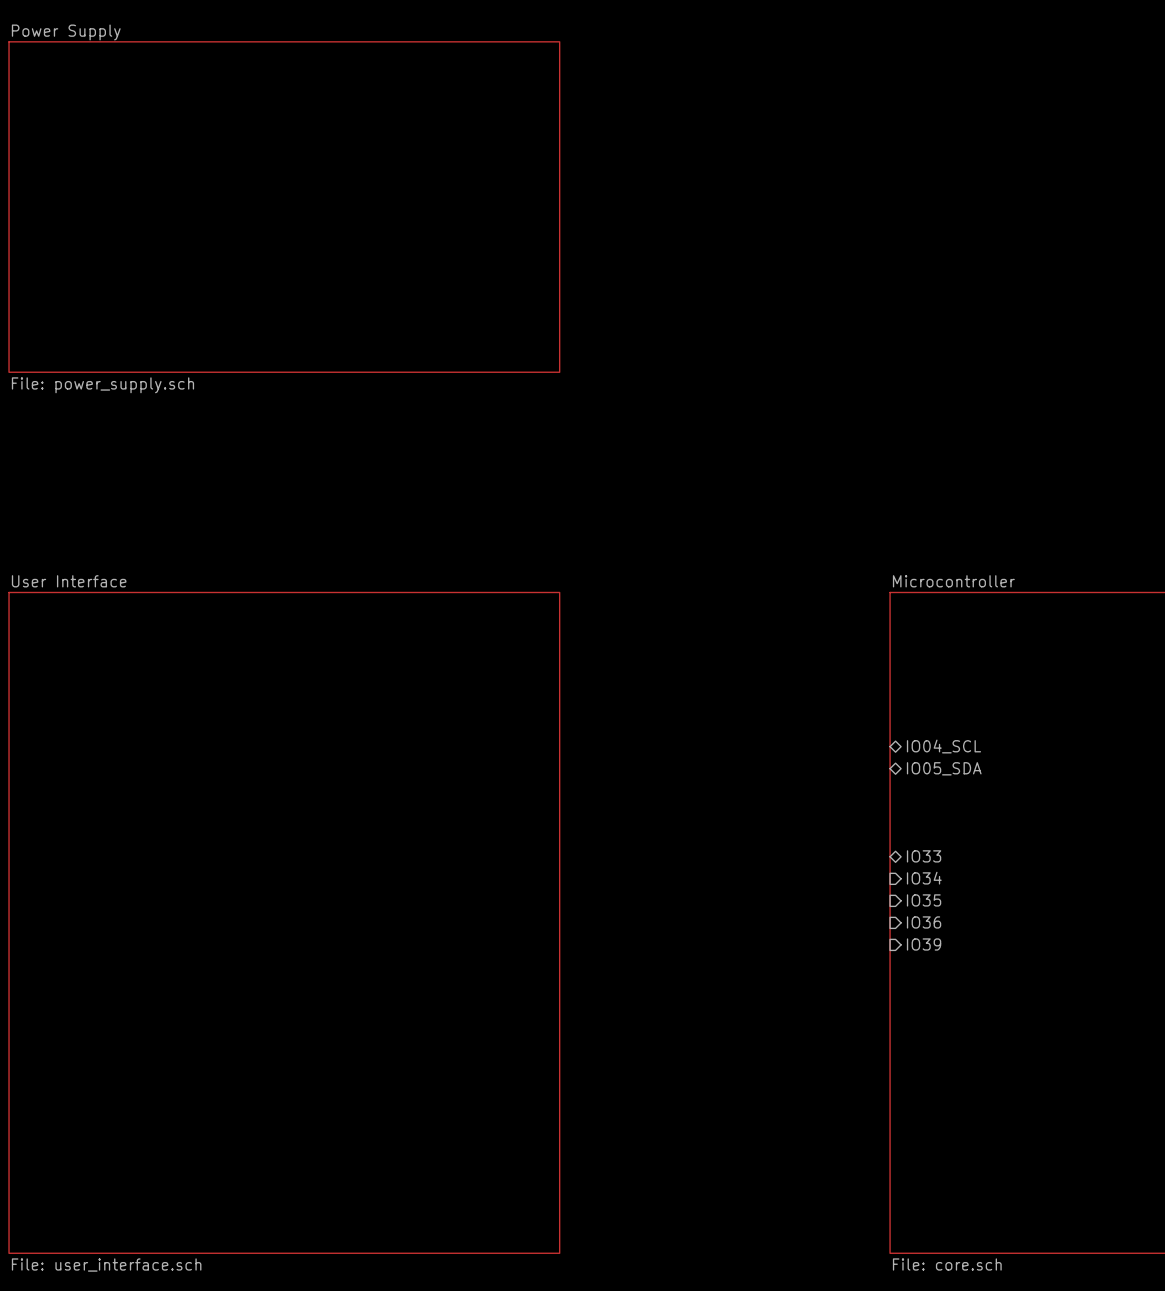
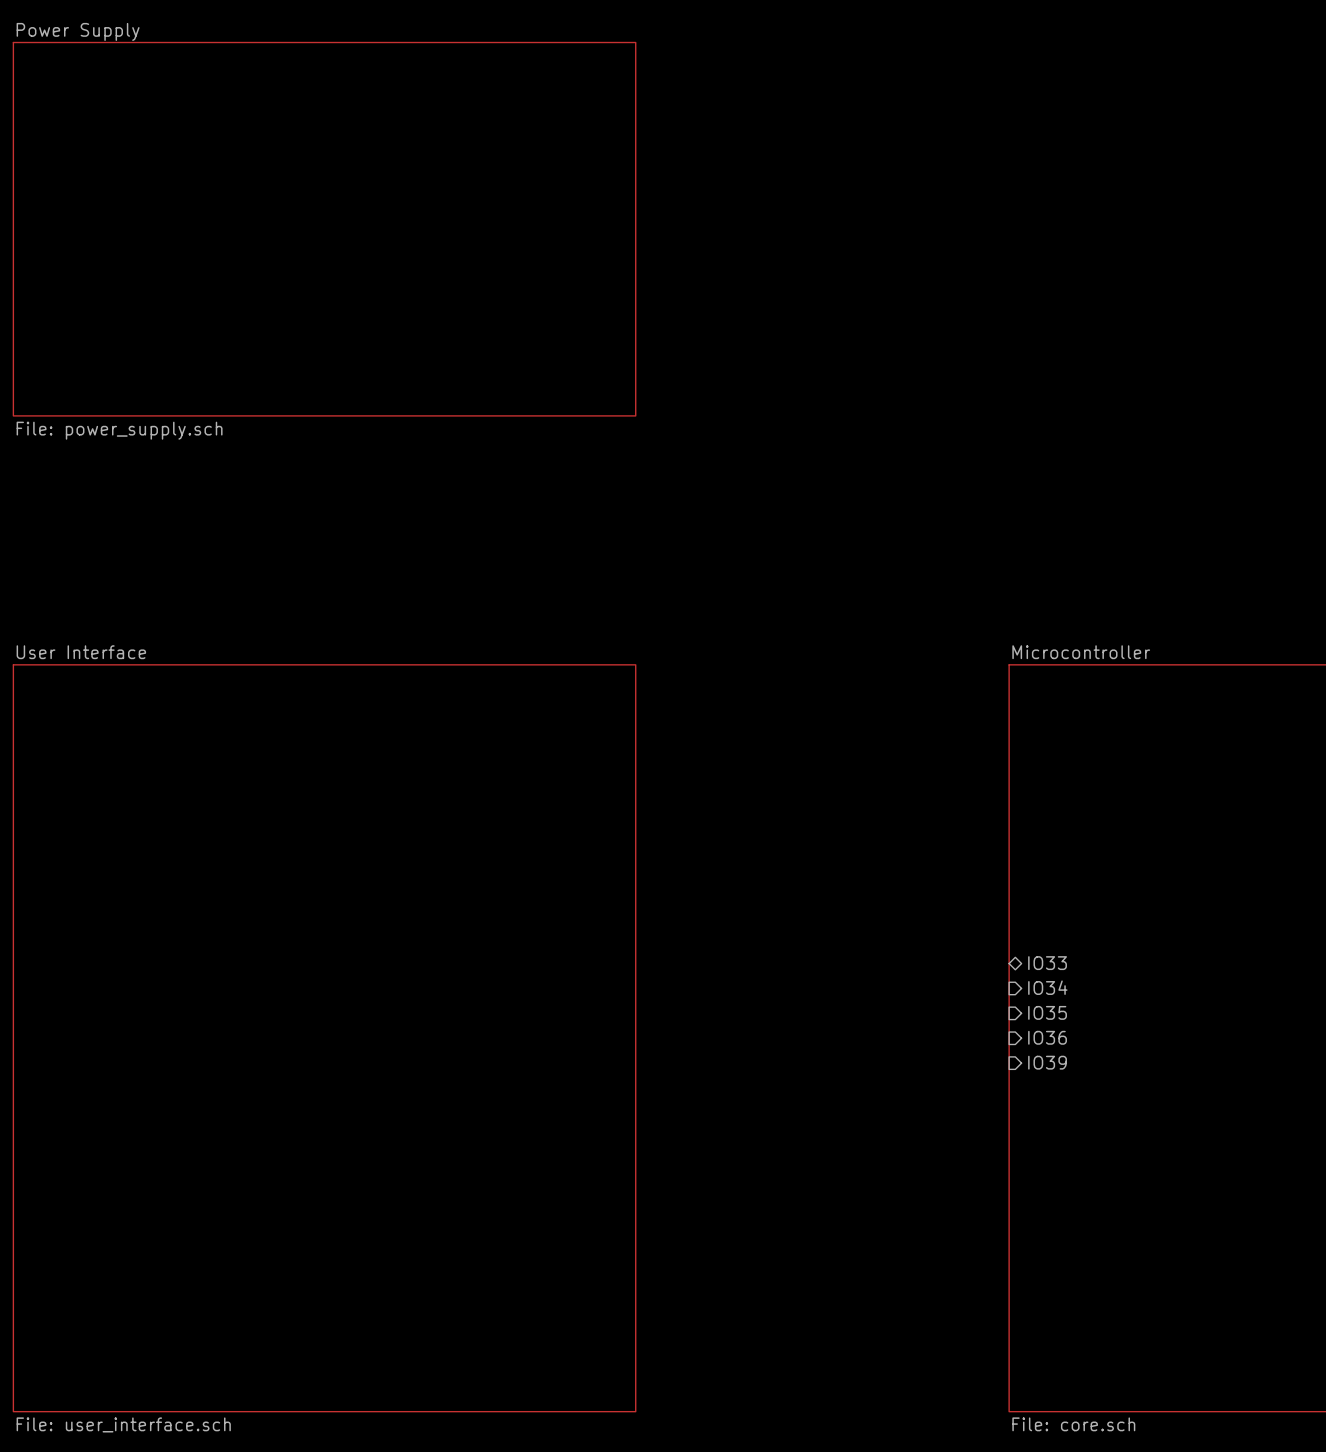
sheet pin: IO04_SCL (943, 746) -> none
sheet pin: IO05_SDA (944, 768) -> none

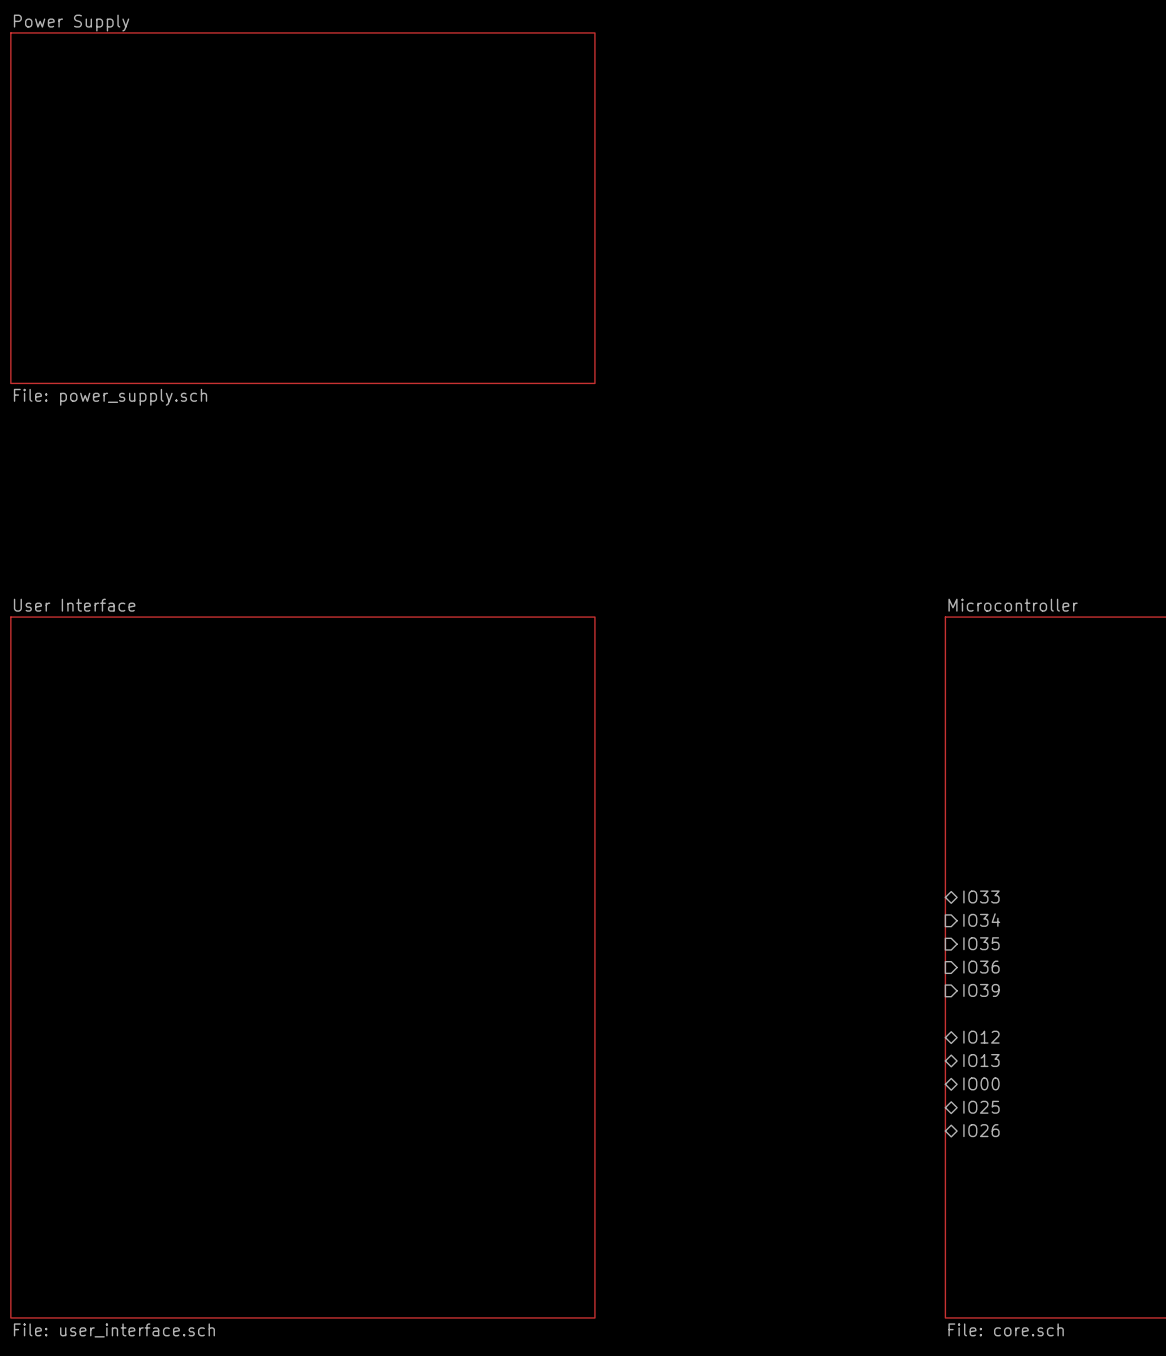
sheet pin: none -> IO12 (981, 1037)
sheet pin: none -> IO13 (981, 1060)
sheet pin: none -> IO00 (981, 1083)
sheet pin: none -> IO25 (981, 1107)
sheet pin: none -> IO26 (981, 1130)

